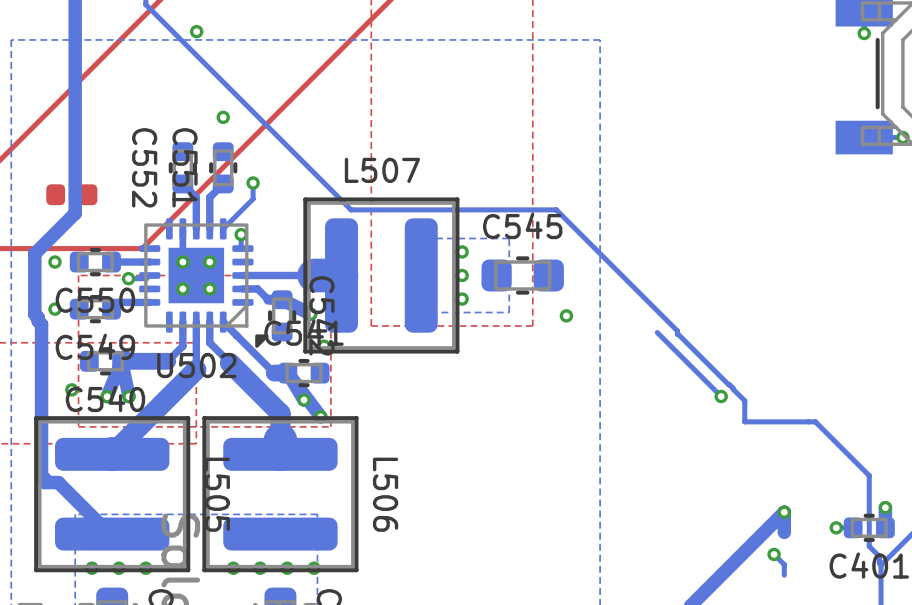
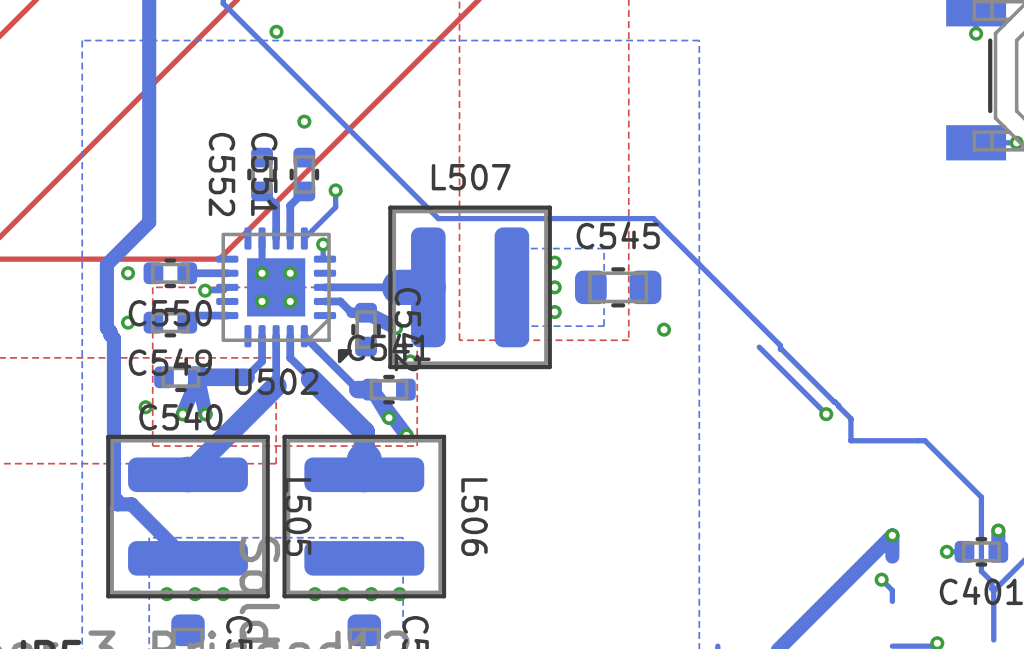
part: (71, 194) -> none

